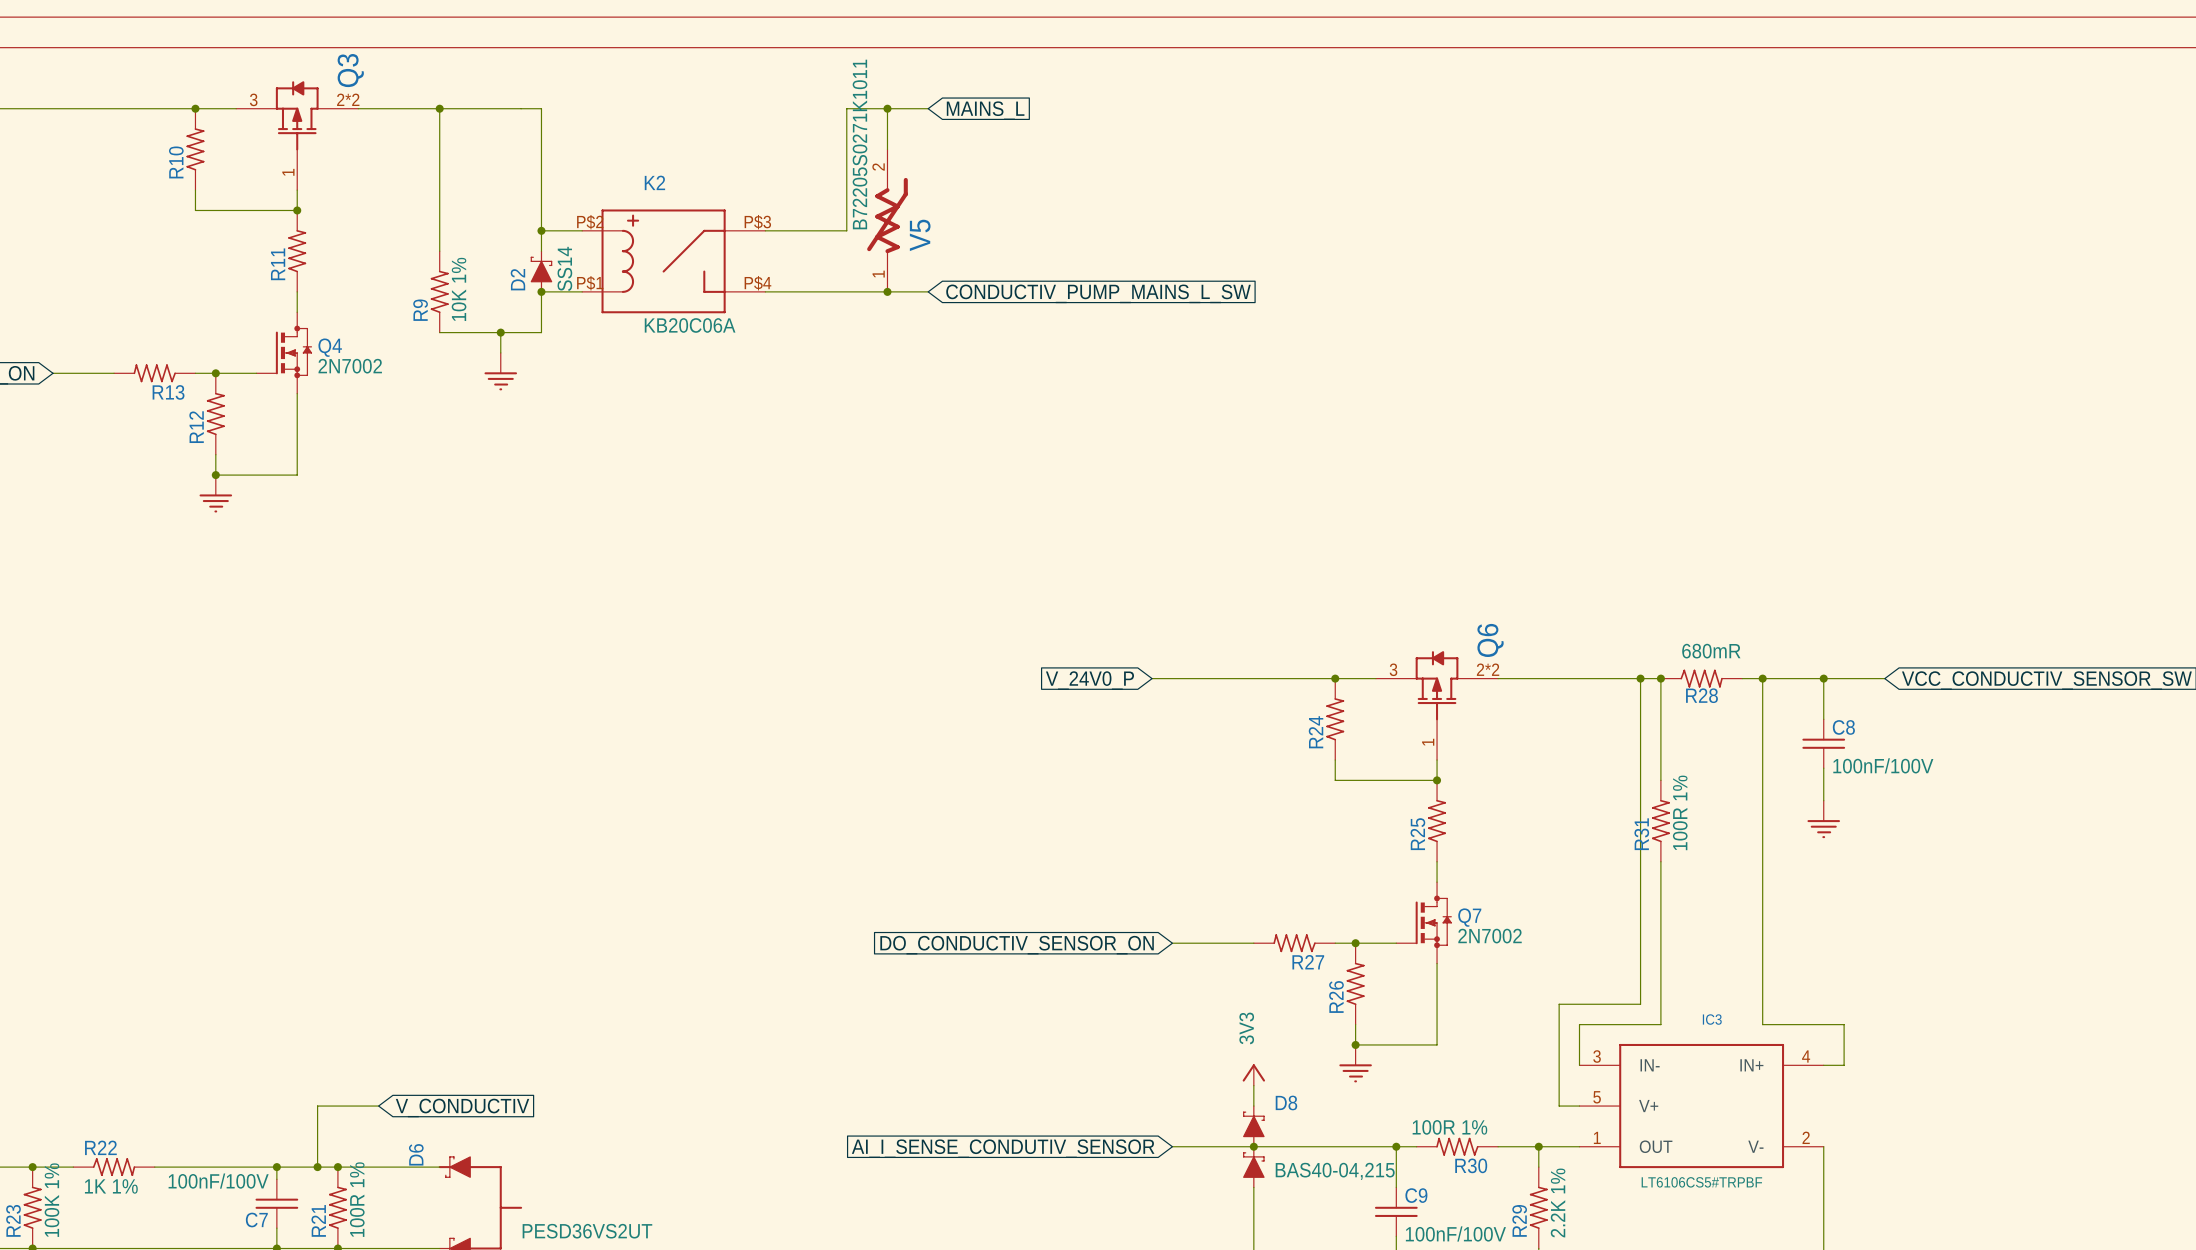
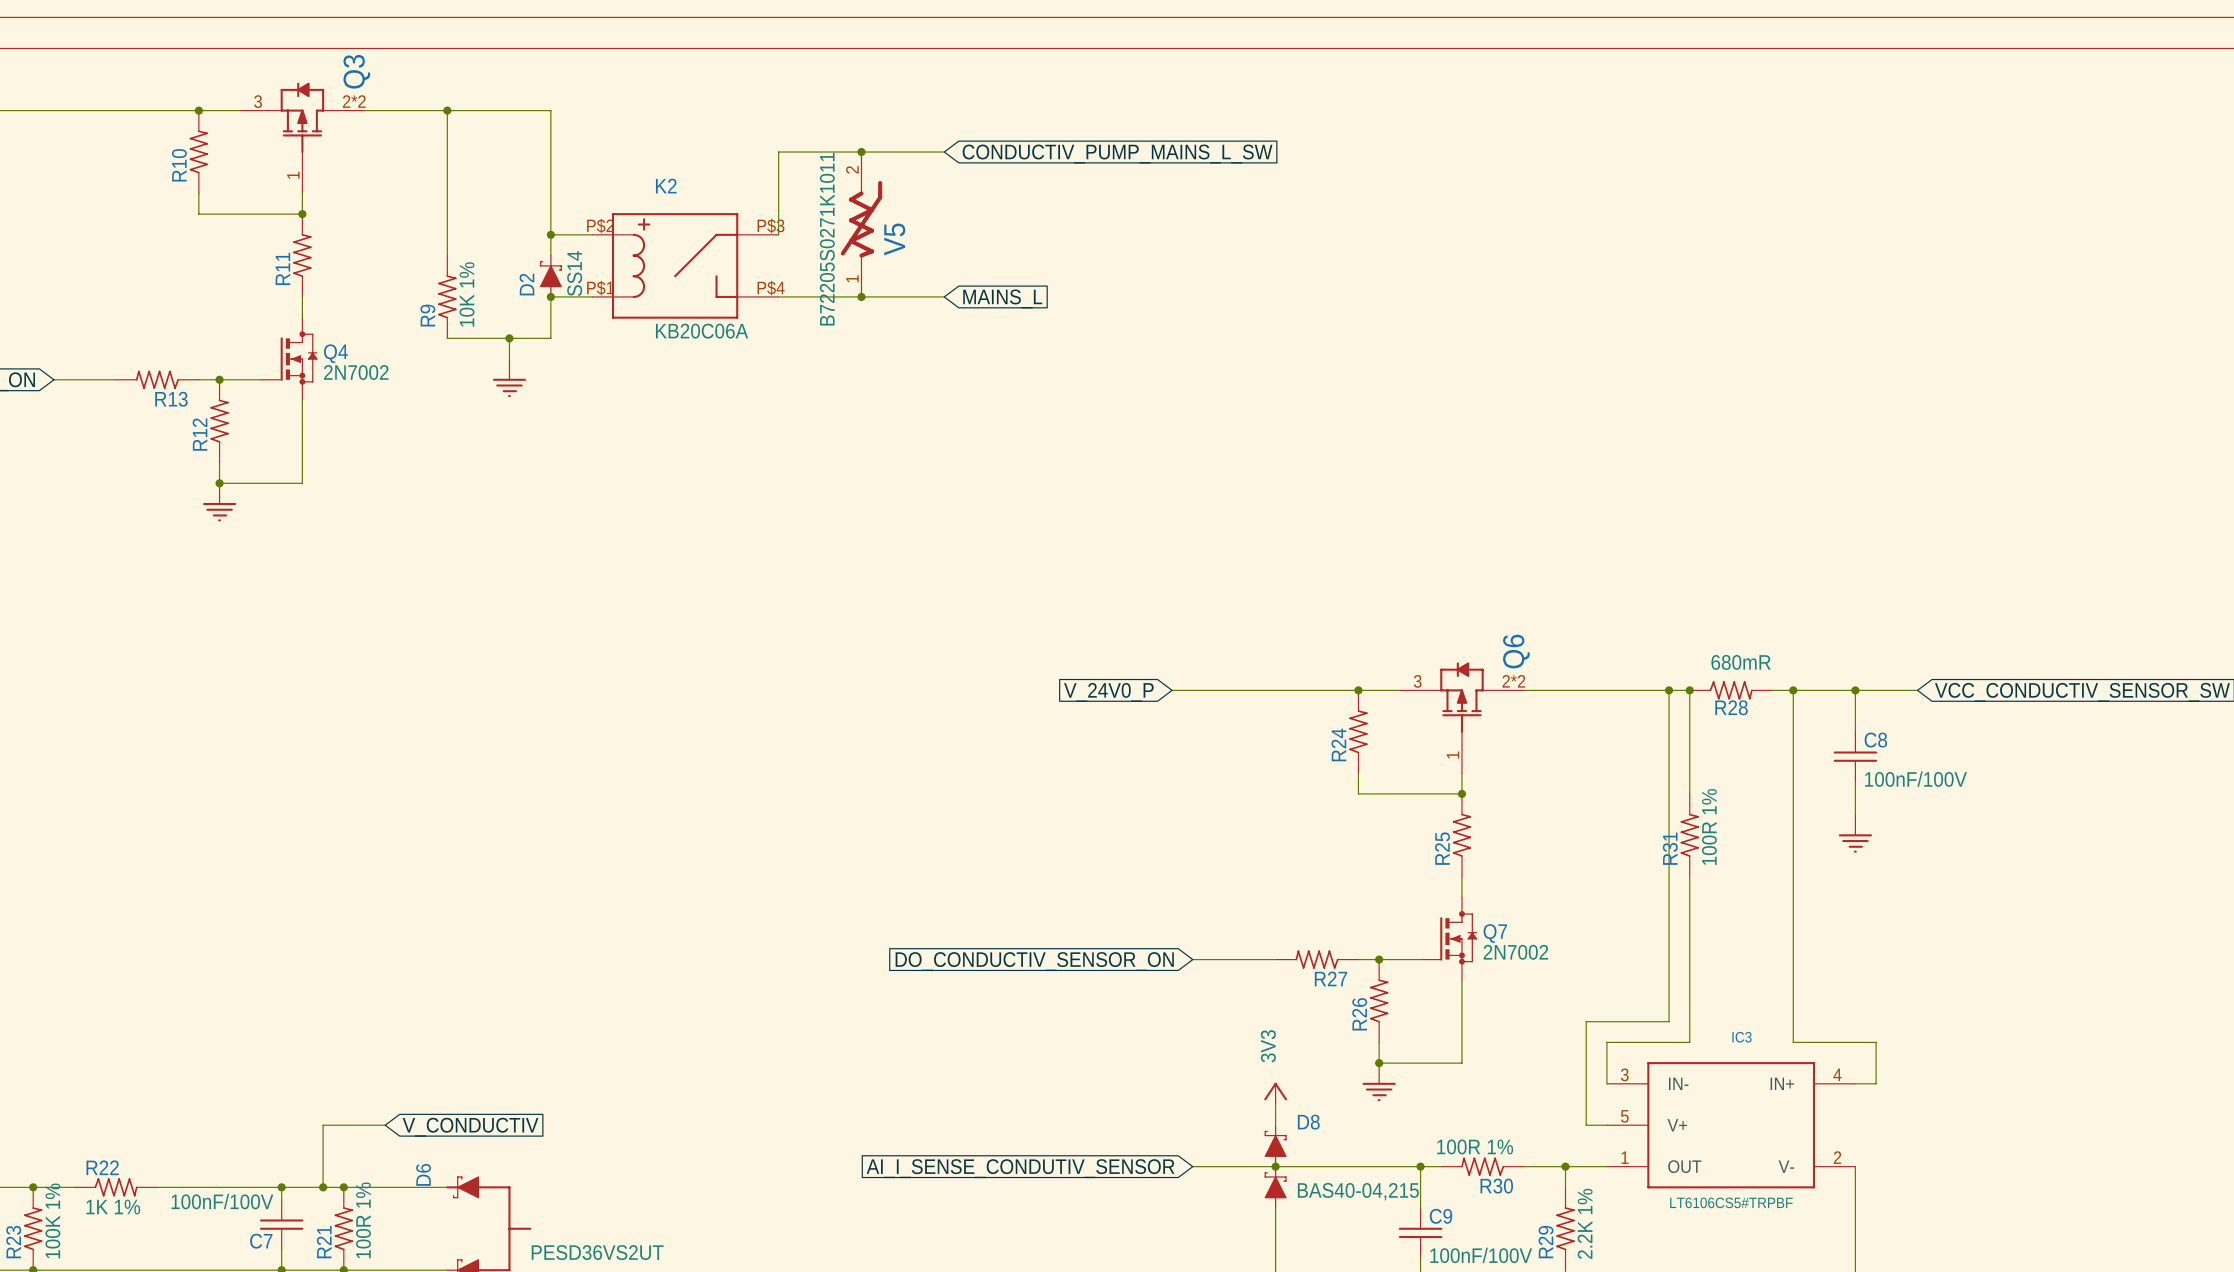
wire: (887, 108) (887, 149) -> none
junction: (887, 108) -> none
wire: (928, 108) (846, 108) (846, 230) (765, 230) -> (944, 152) (778, 152) (778, 234)
global label: MAINS_L (985, 110) -> none
V5 value position: B72205S0271K1011 (860, 144) -> B72205S0271K1011 (827, 239)
junction: none -> (861, 152)
global label: none -> CONDUCTIV_PUMP_MAINS_L_SW (1117, 154)
V5 position: (887, 220) -> (861, 224)
junction position: (887, 291) -> (861, 296)
global label: CONDUCTIV_PUMP_MAINS_L_SW (1098, 293) -> MAINS_L (1002, 298)

